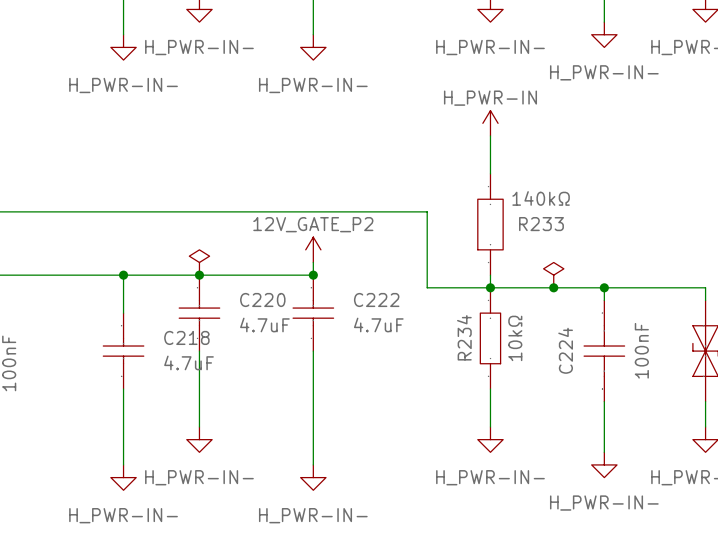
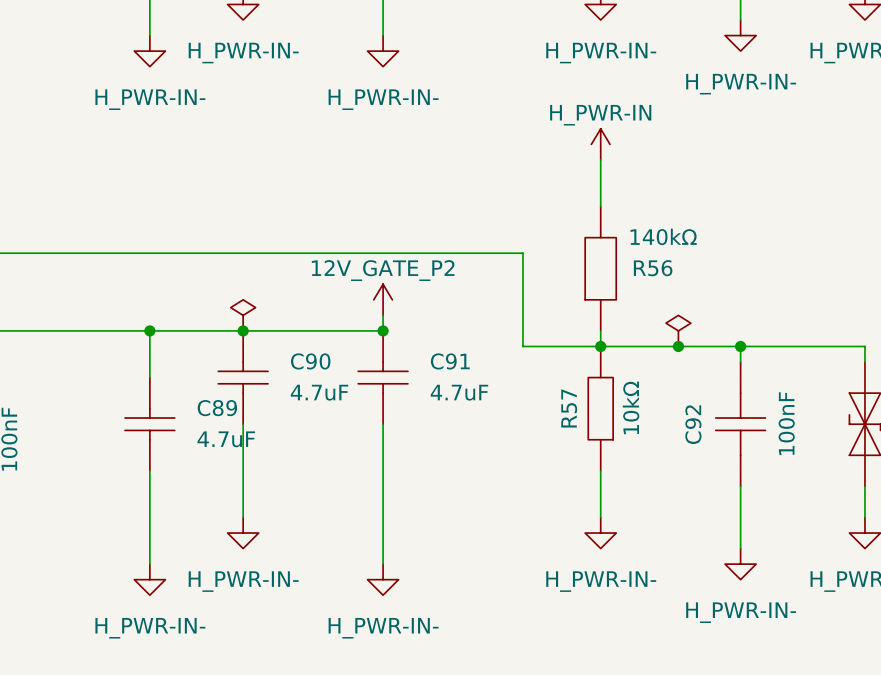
R233 name: R233 (541, 224) -> R56 (653, 268)
C220 name: C220 (262, 299) -> C90 (310, 361)
C222 name: C222 (376, 299) -> C91 (450, 361)
C218 name: C218 (186, 337) -> C89 (217, 408)
R234 name: R234 (464, 337) -> R57 (569, 408)
C224 name: C224 (565, 350) -> C92 (693, 424)

